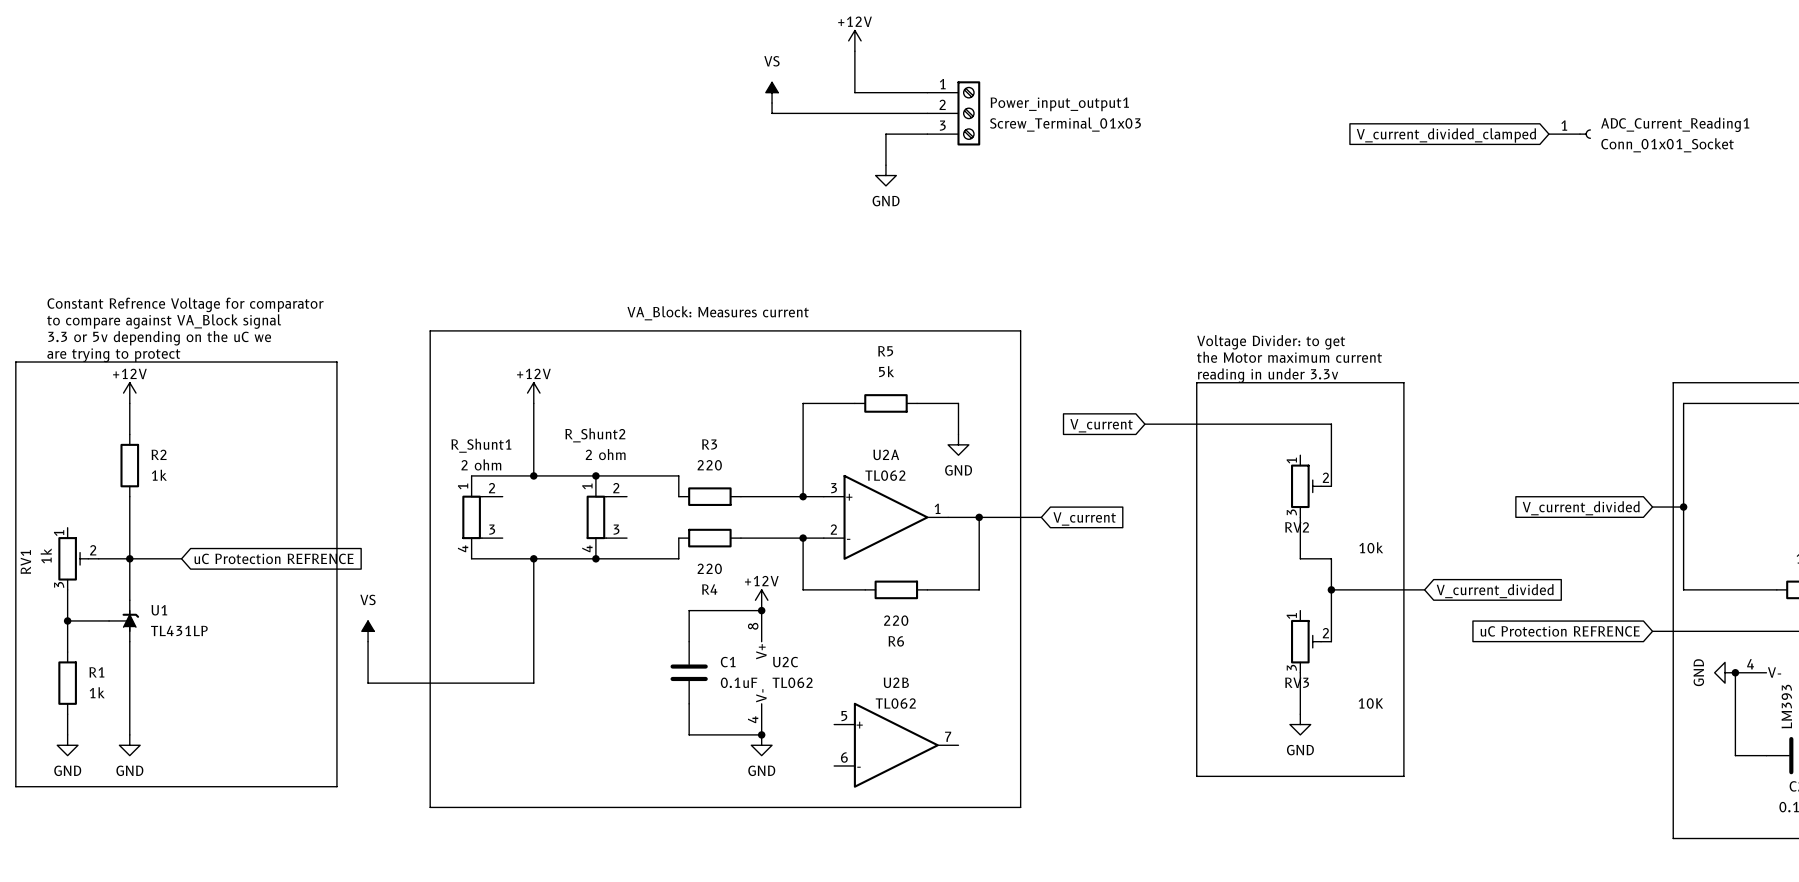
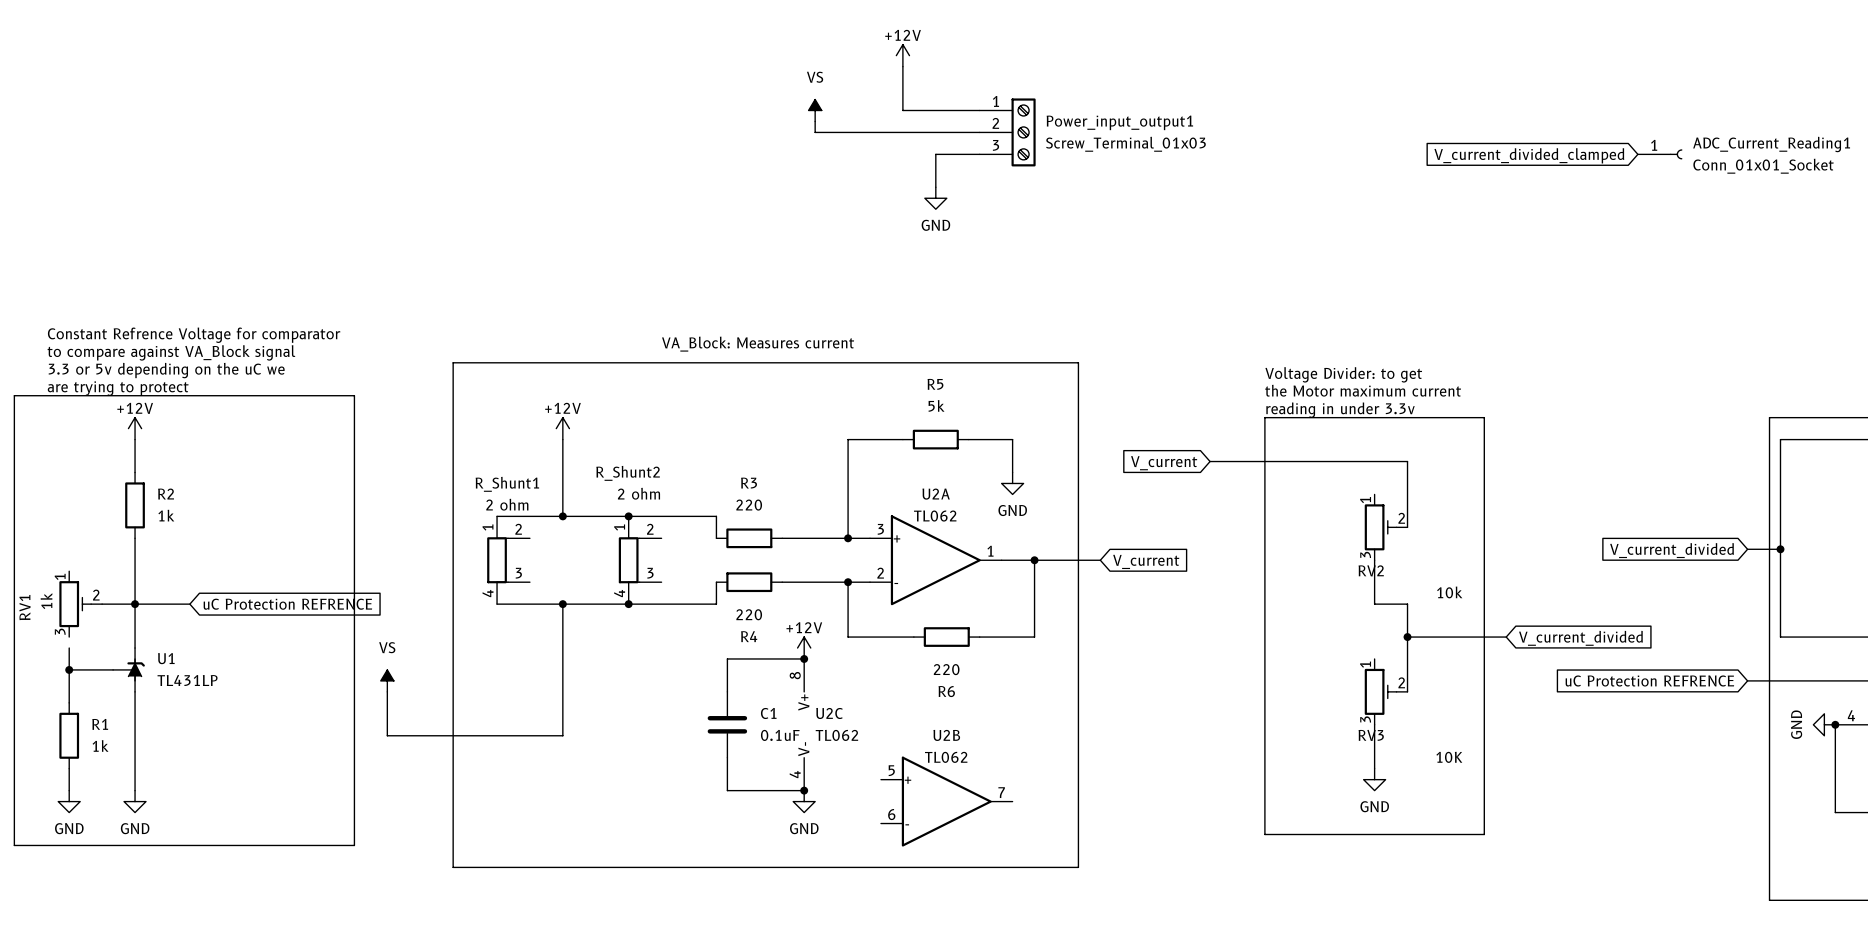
wire: (67, 589) (67, 600) -> none

